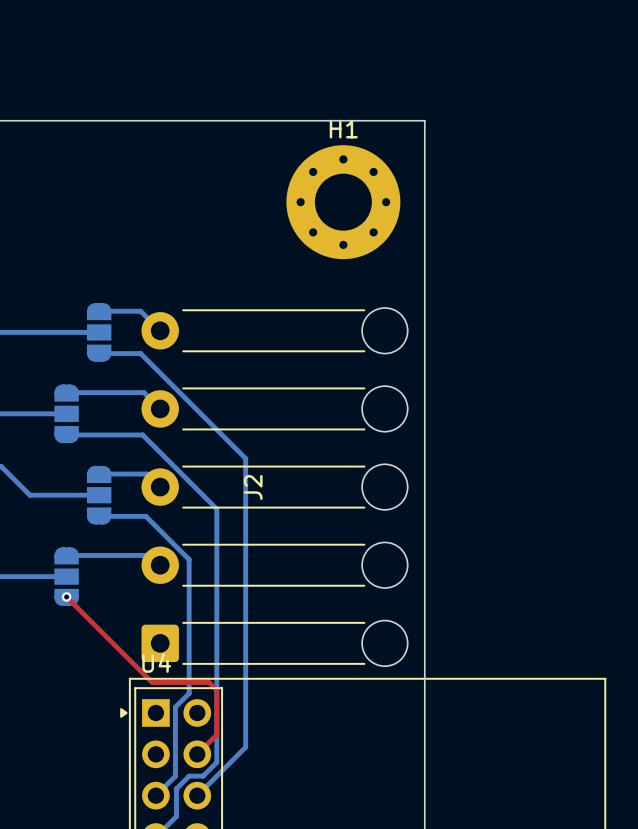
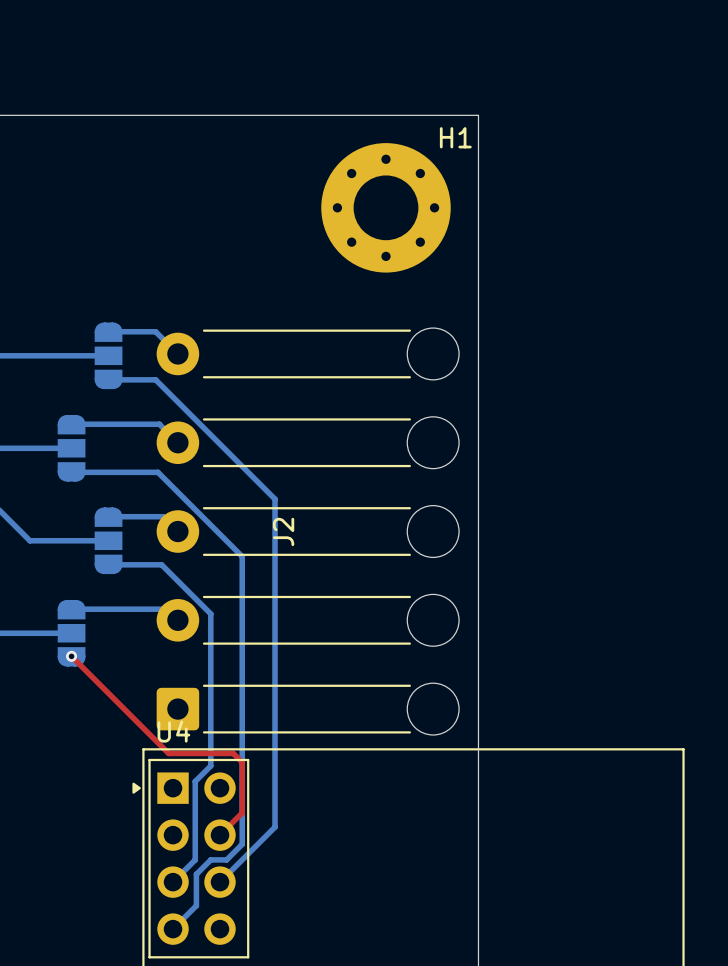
H1 name position: H1 (343, 129) -> H1 (455, 137)

